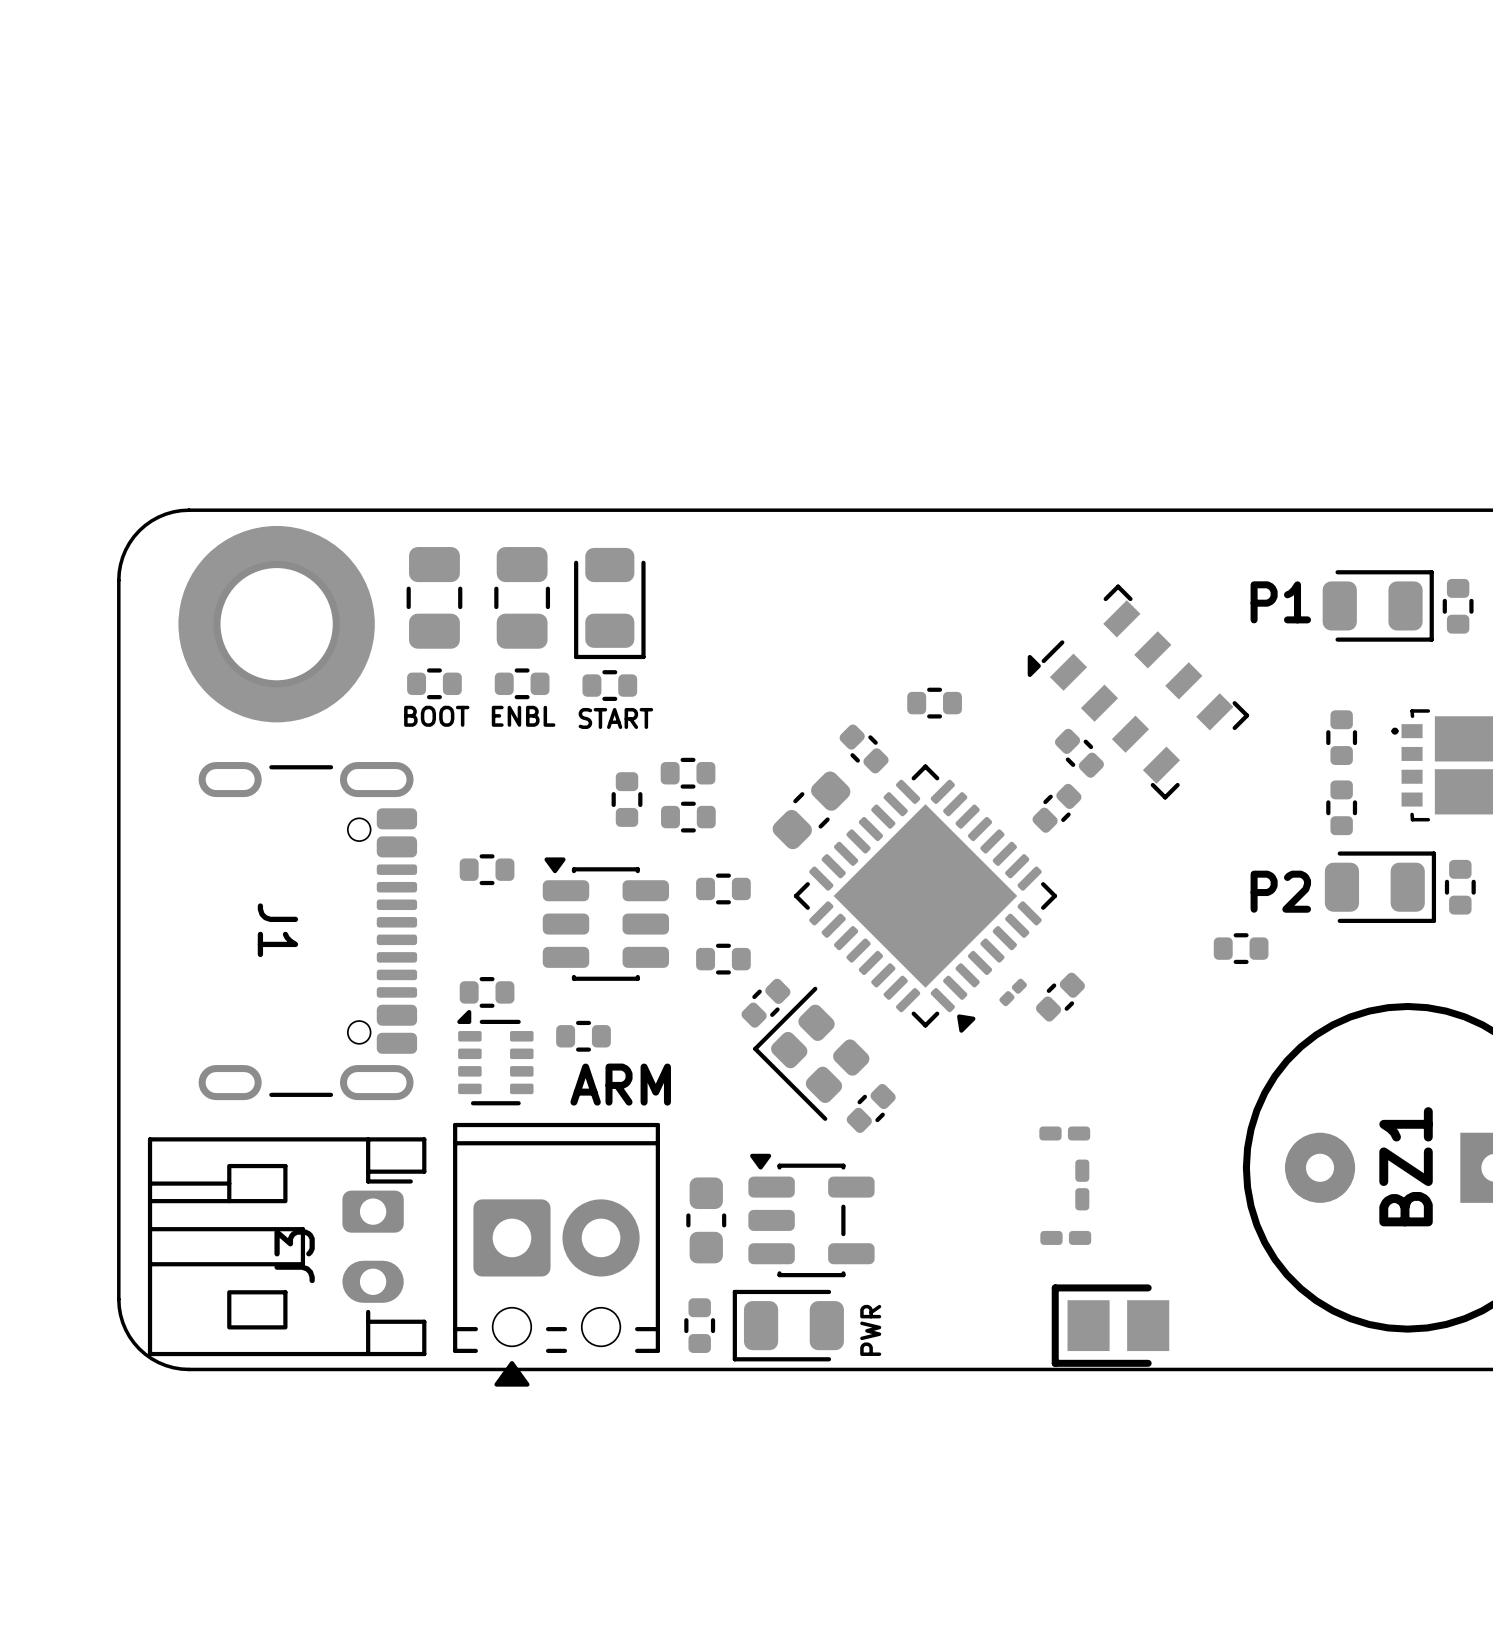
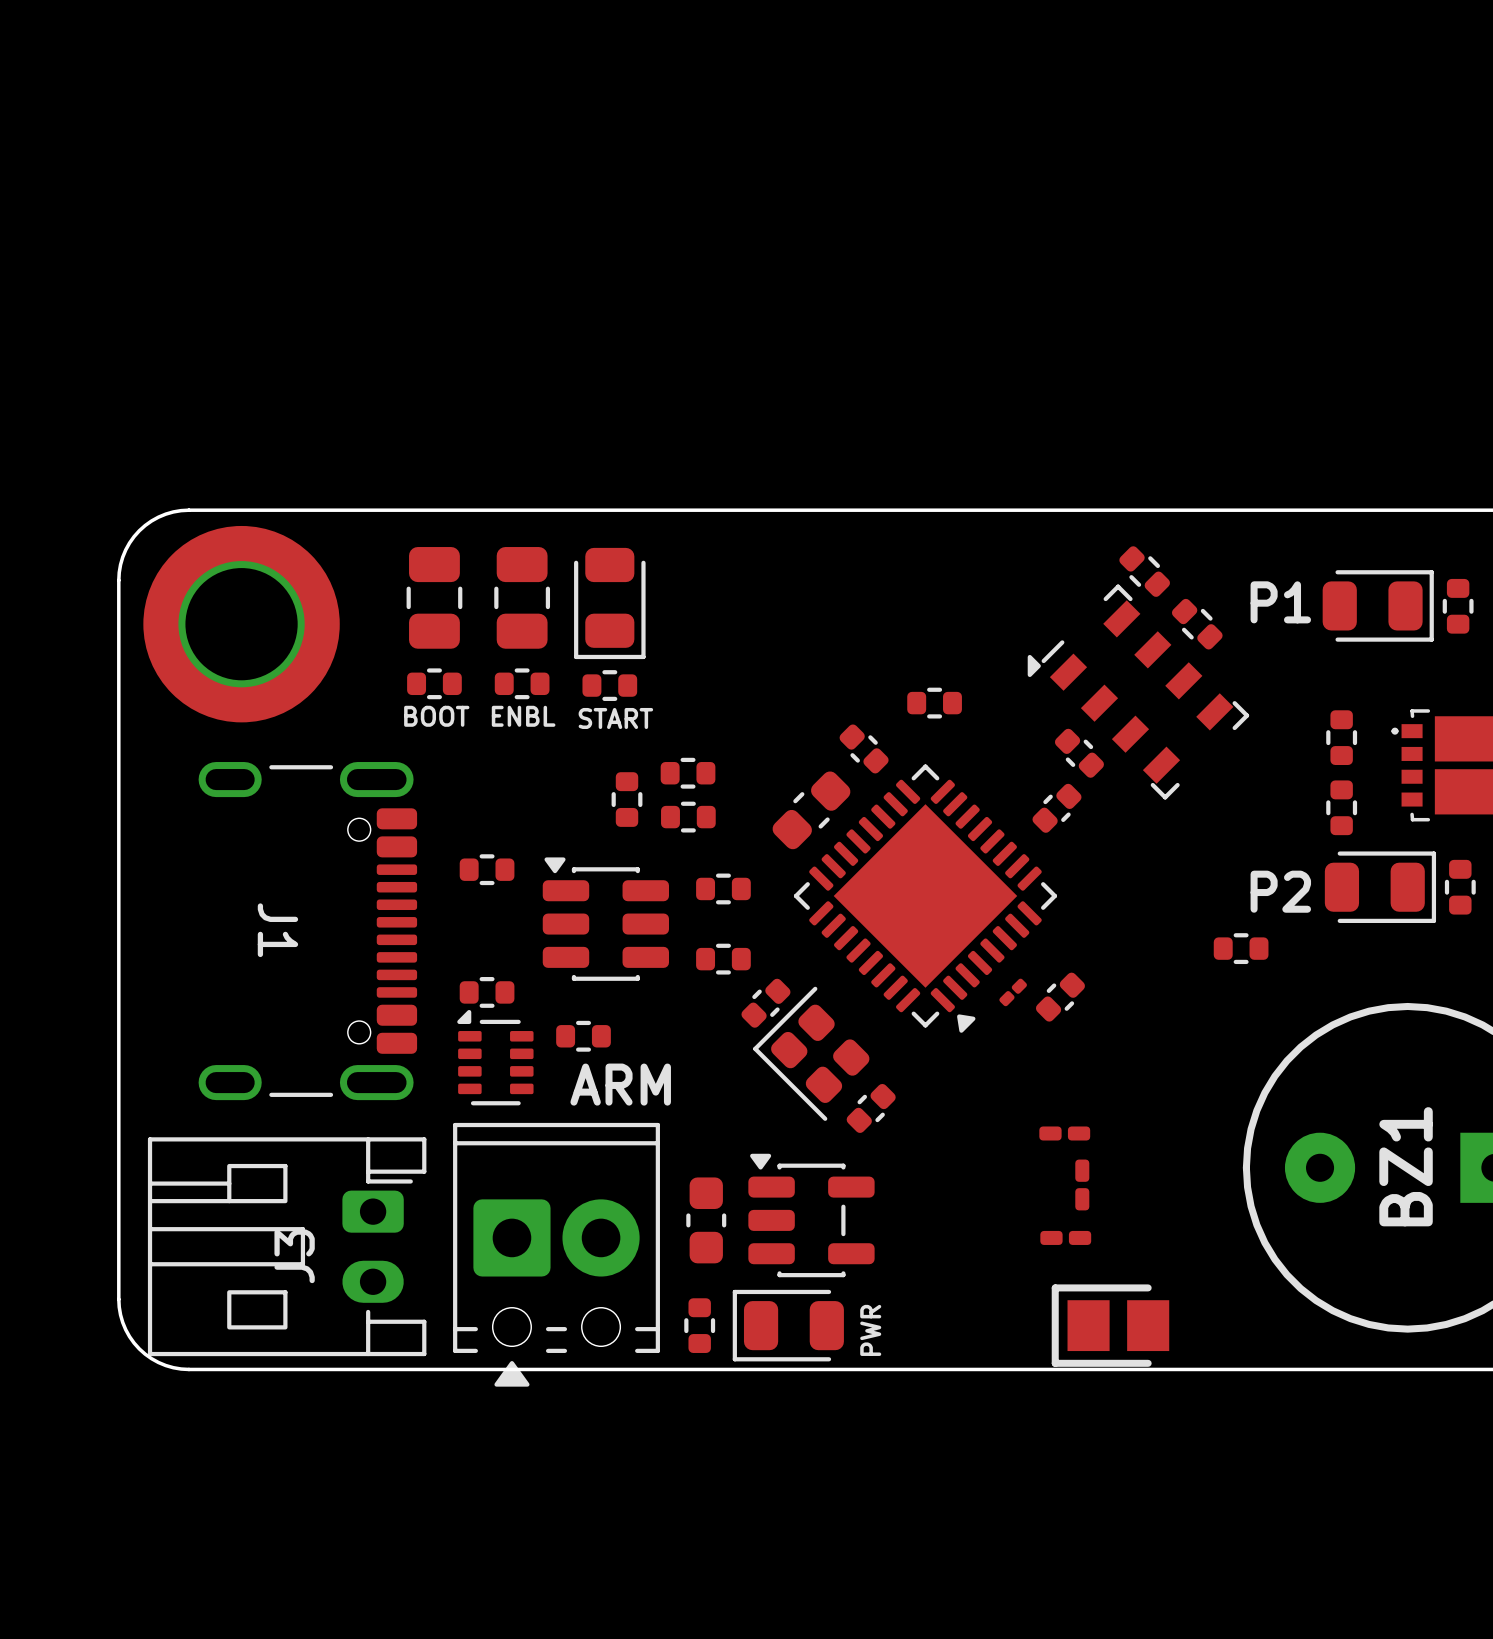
part: none -> (1144, 571)
part position: (276, 624) -> (241, 624)
part: none -> (1197, 624)

